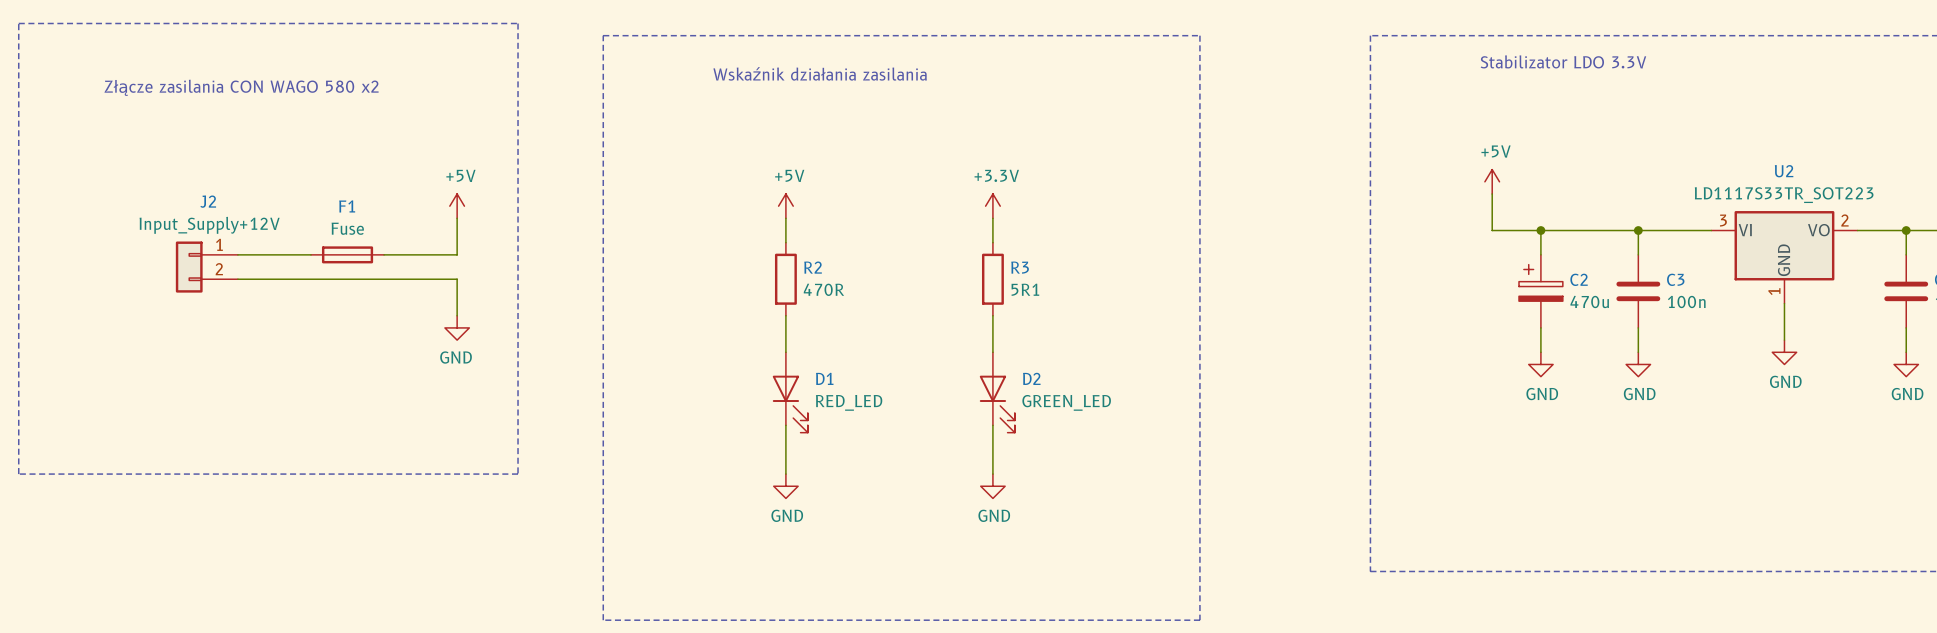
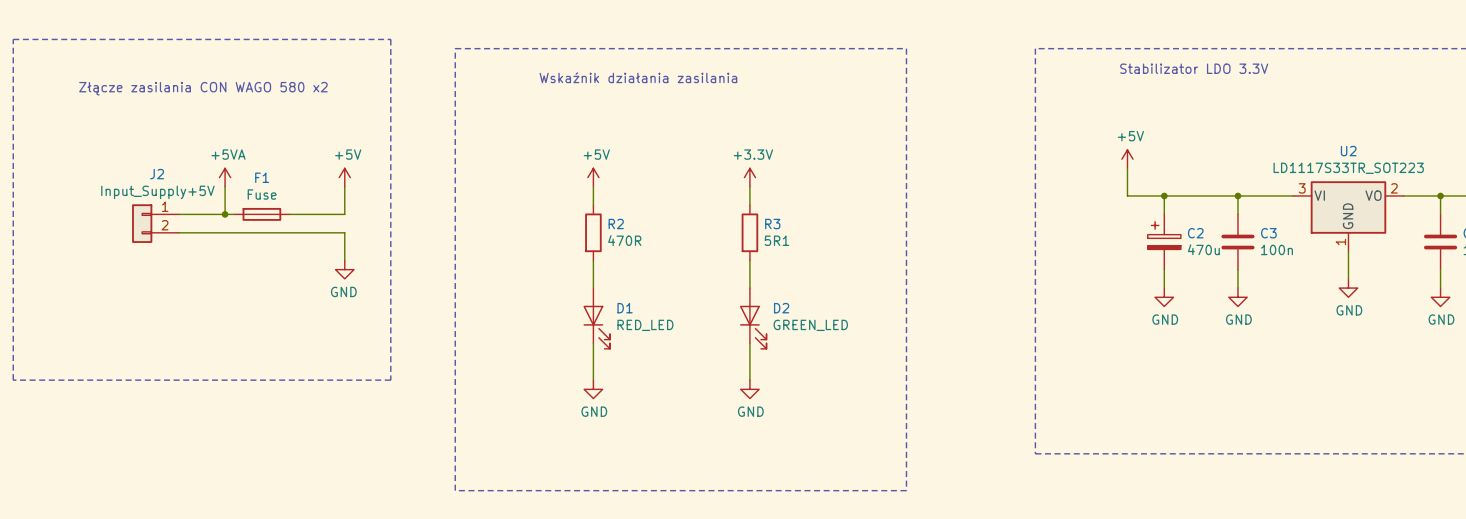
power symbol: none -> +5VA (225, 177)
wire: none -> (225, 186) (225, 214)
J2 value: Input_Supply+12V (209, 225) -> Input_Supply+5V (157, 192)
junction: none -> (225, 214)

